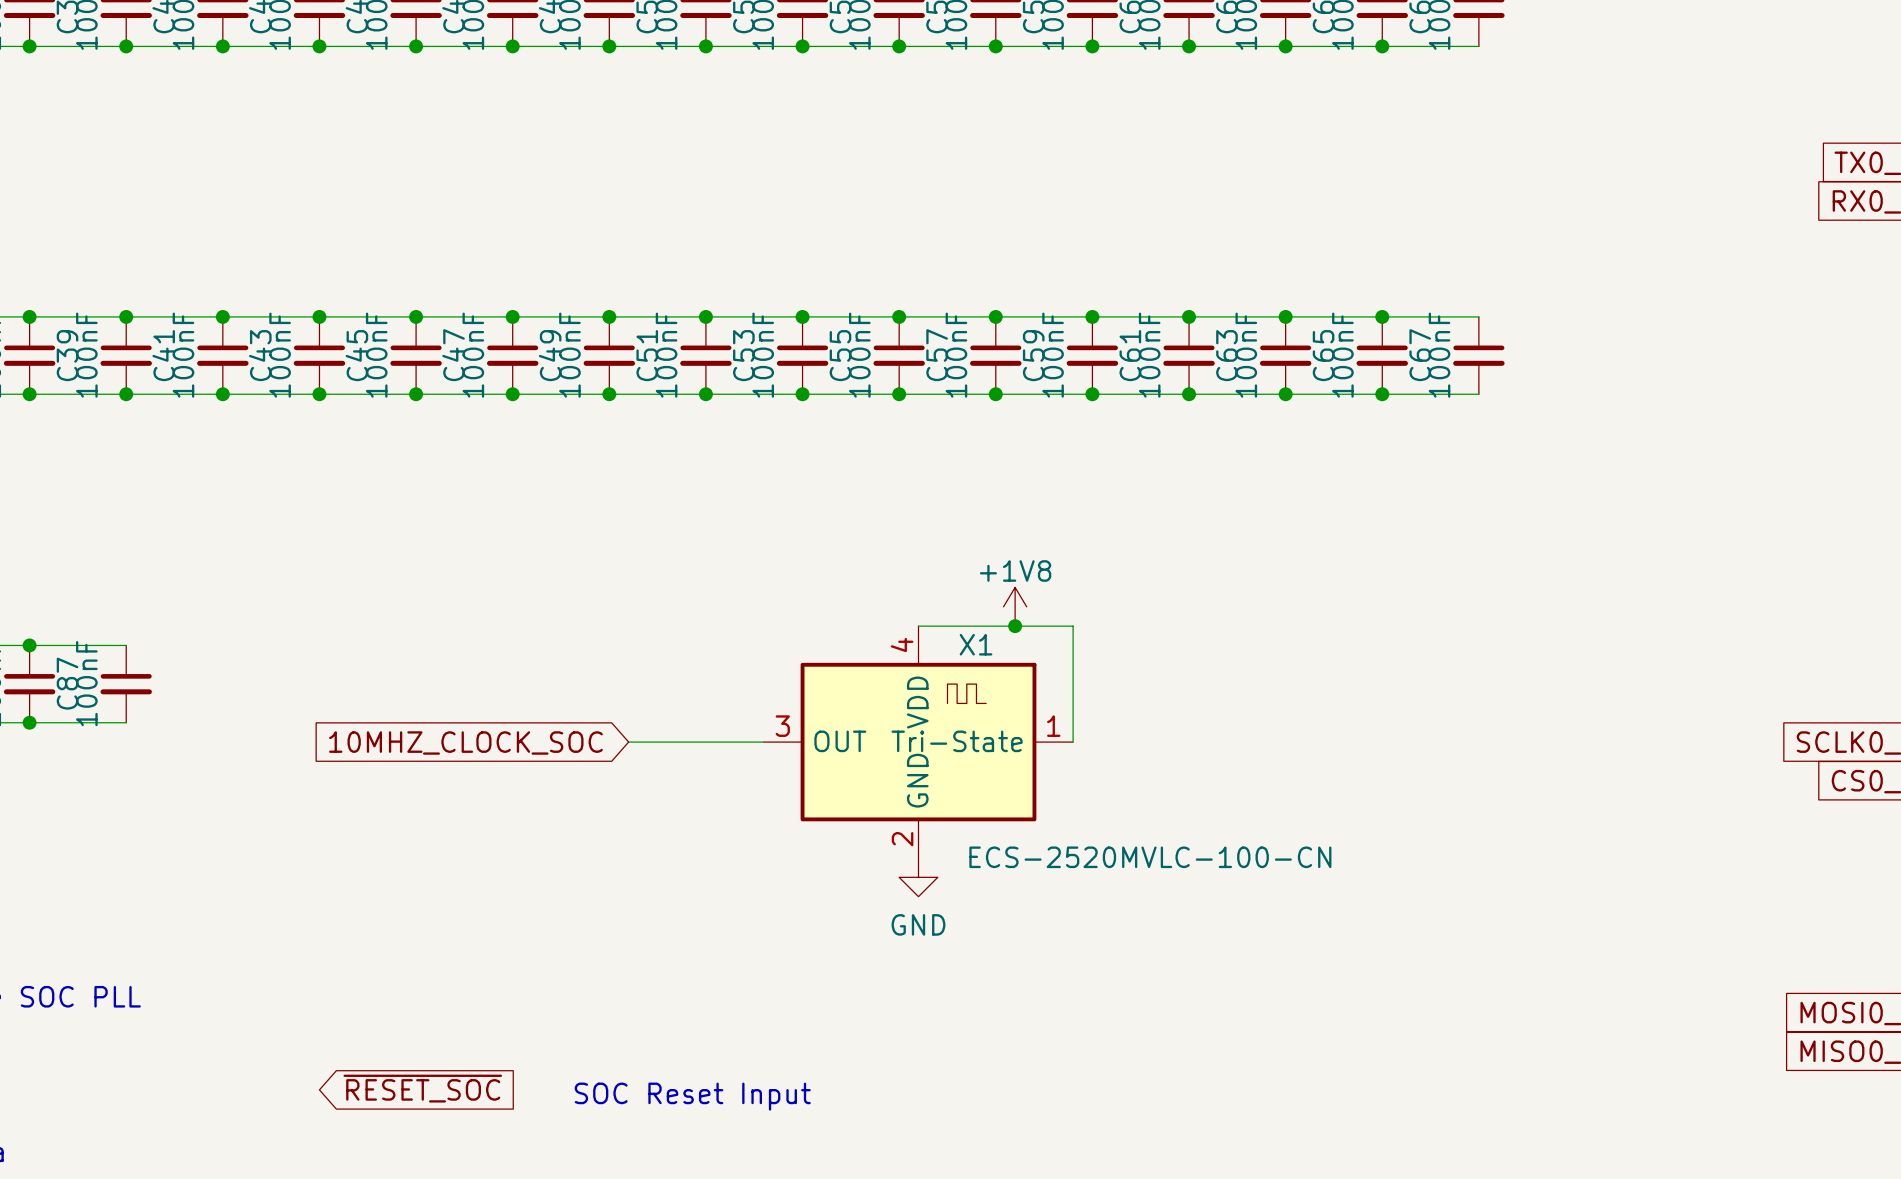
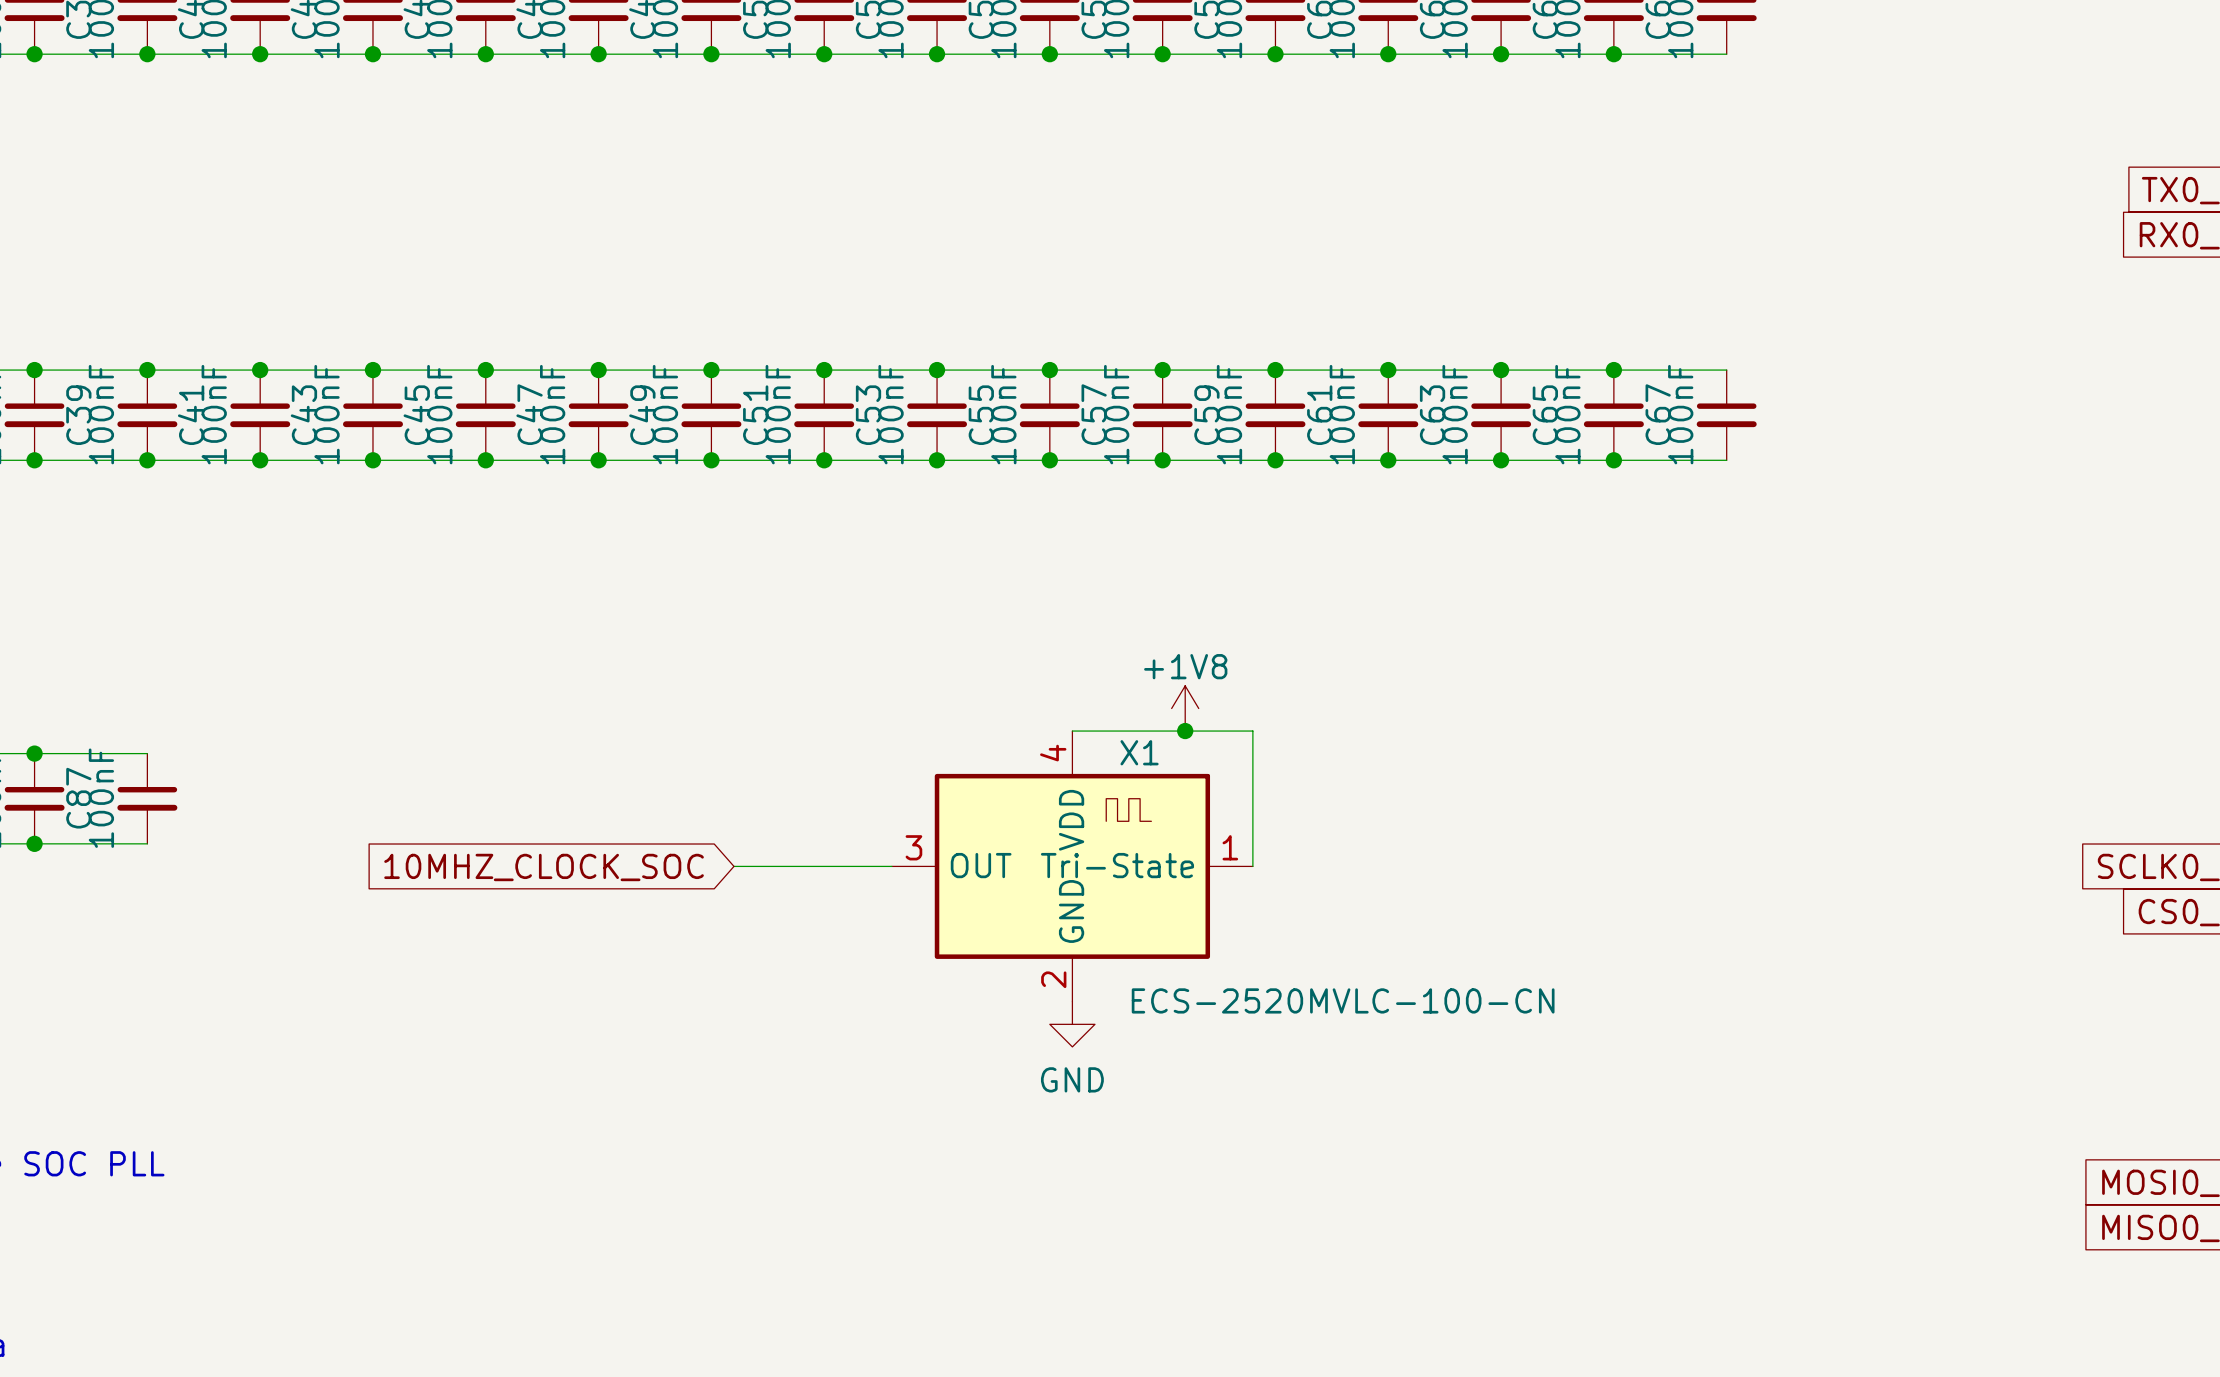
global label: ~{RESET_SOC} (422, 1088) -> none
text: SOC Reset Input (692, 1096) -> none

